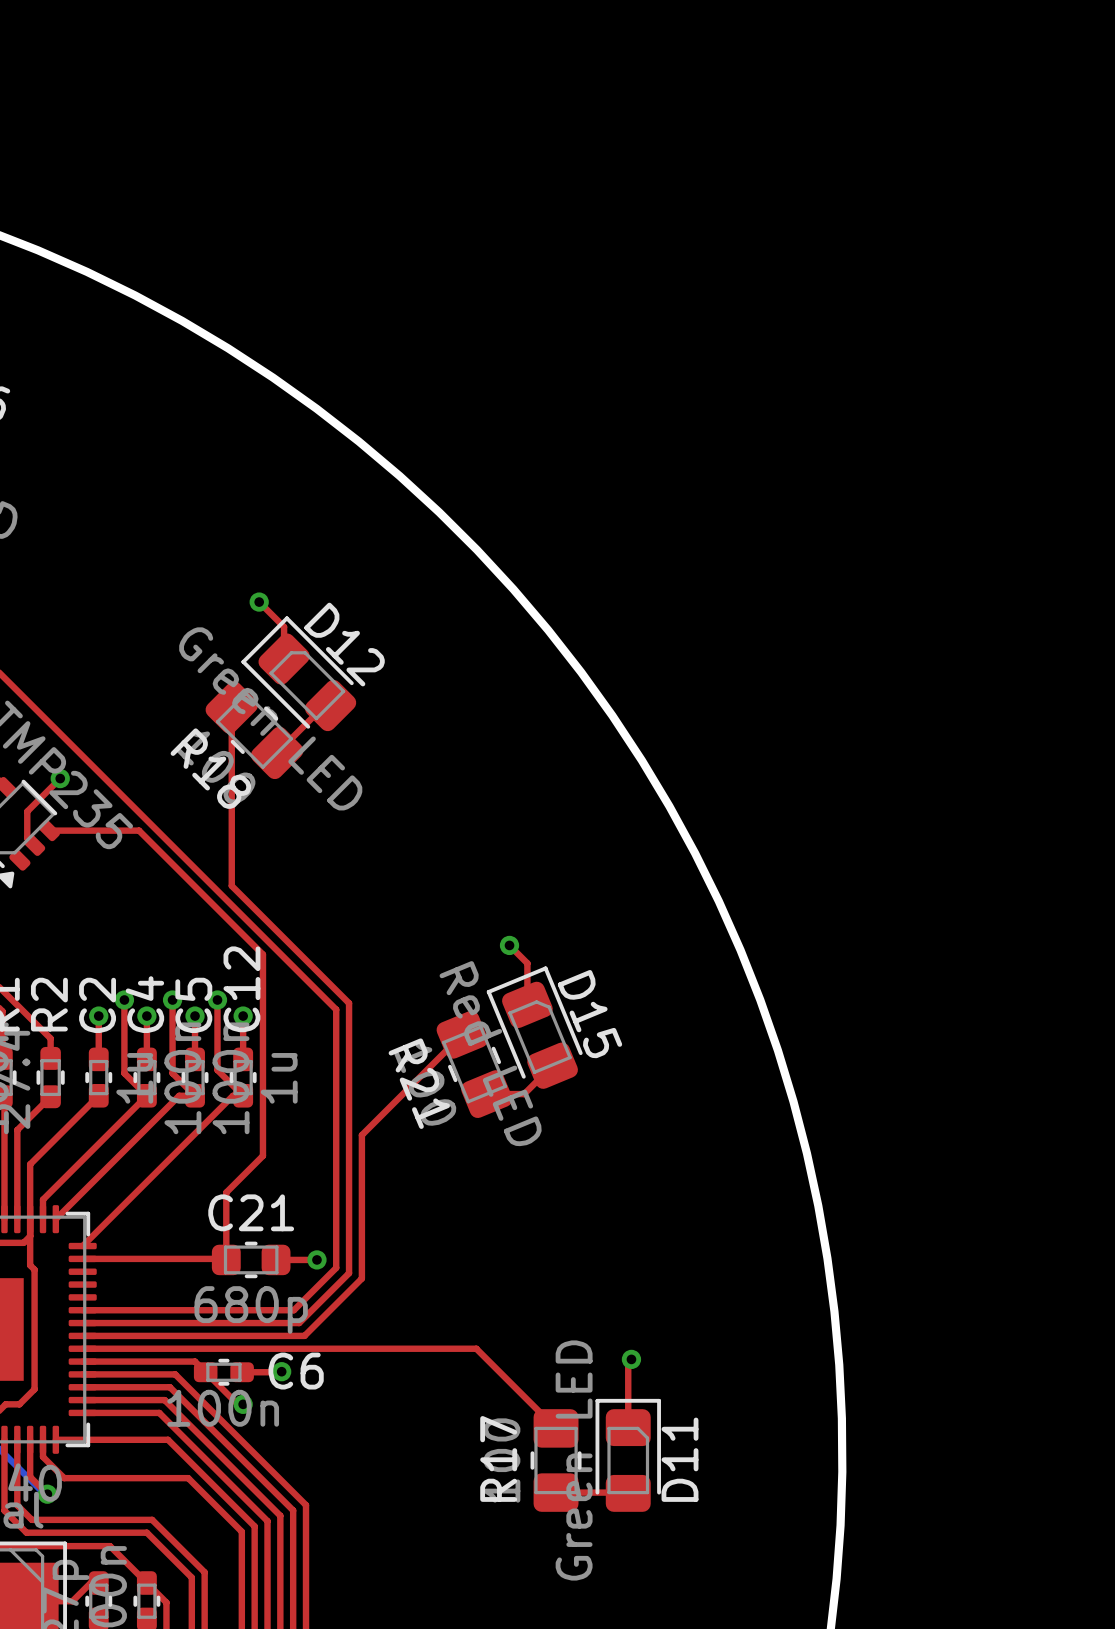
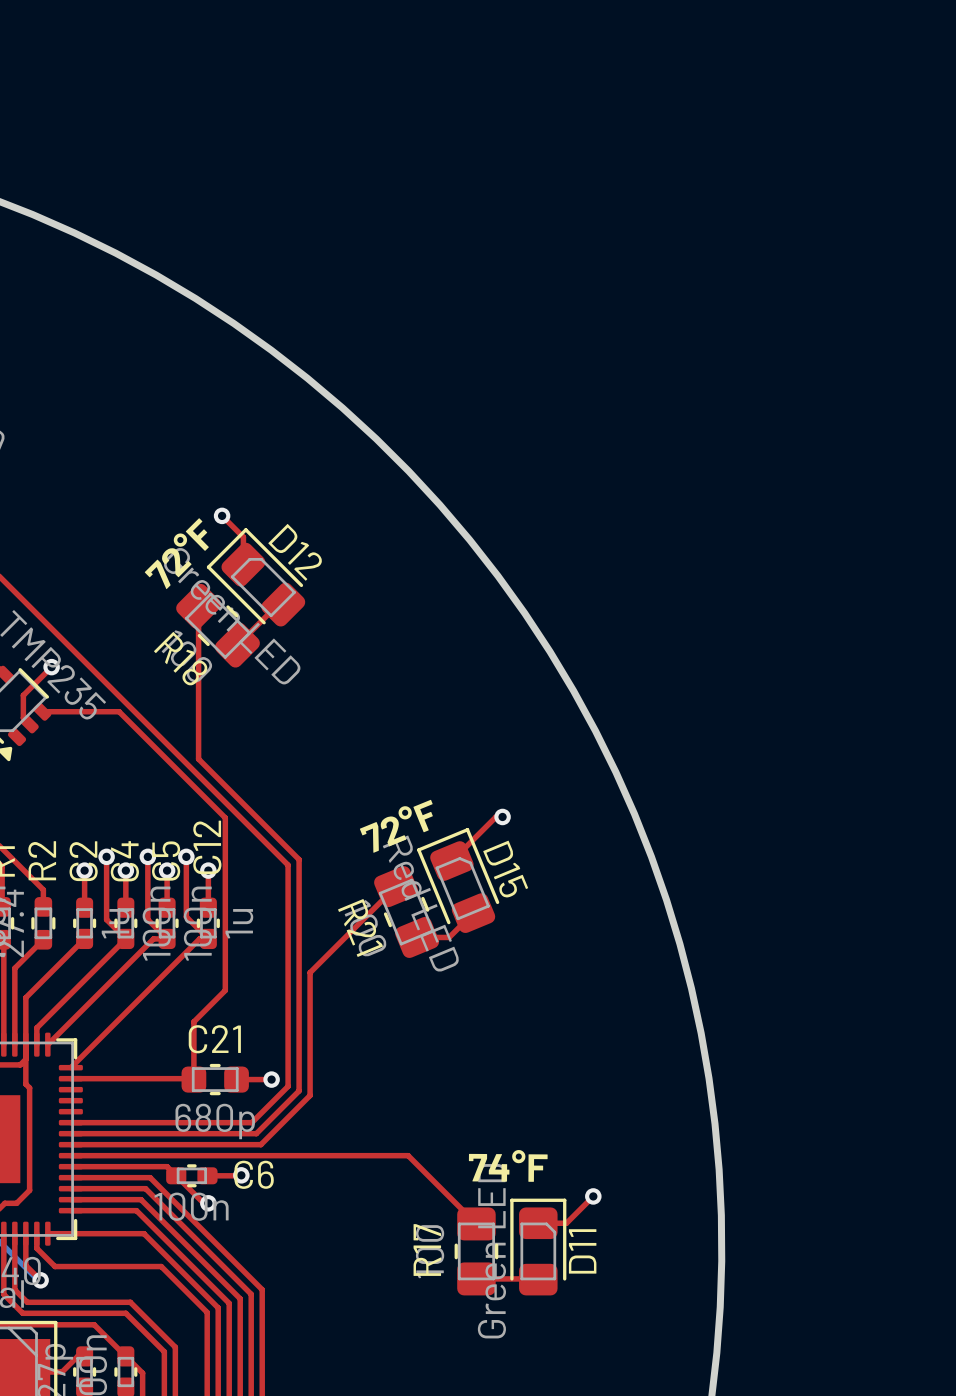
text: none -> 72°F (176, 553)
top track: (509, 945) (527, 963) (527, 1004) -> (502, 816) (495, 816) (451, 861)
via position: (509, 945) -> (502, 816)
text: none -> 72°F (396, 826)
top track: (631, 1359) (628, 1362) (628, 1427) -> (593, 1196) (566, 1223) (538, 1223)
via position: (631, 1359) -> (593, 1196)
text: none -> 74°F (508, 1165)

